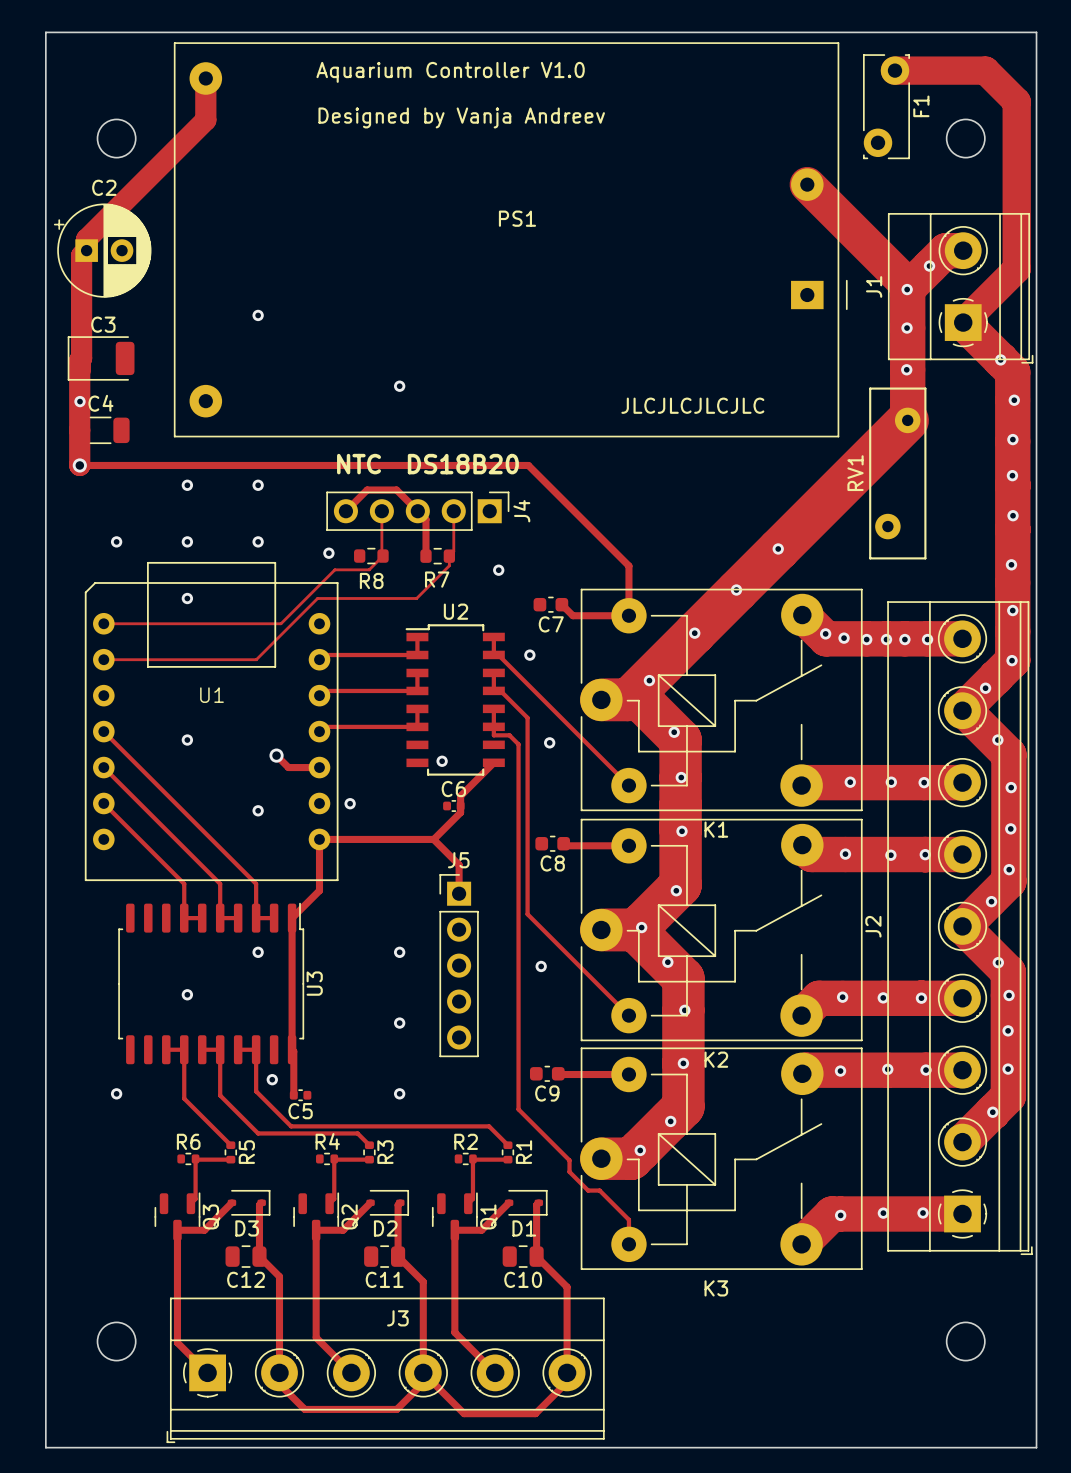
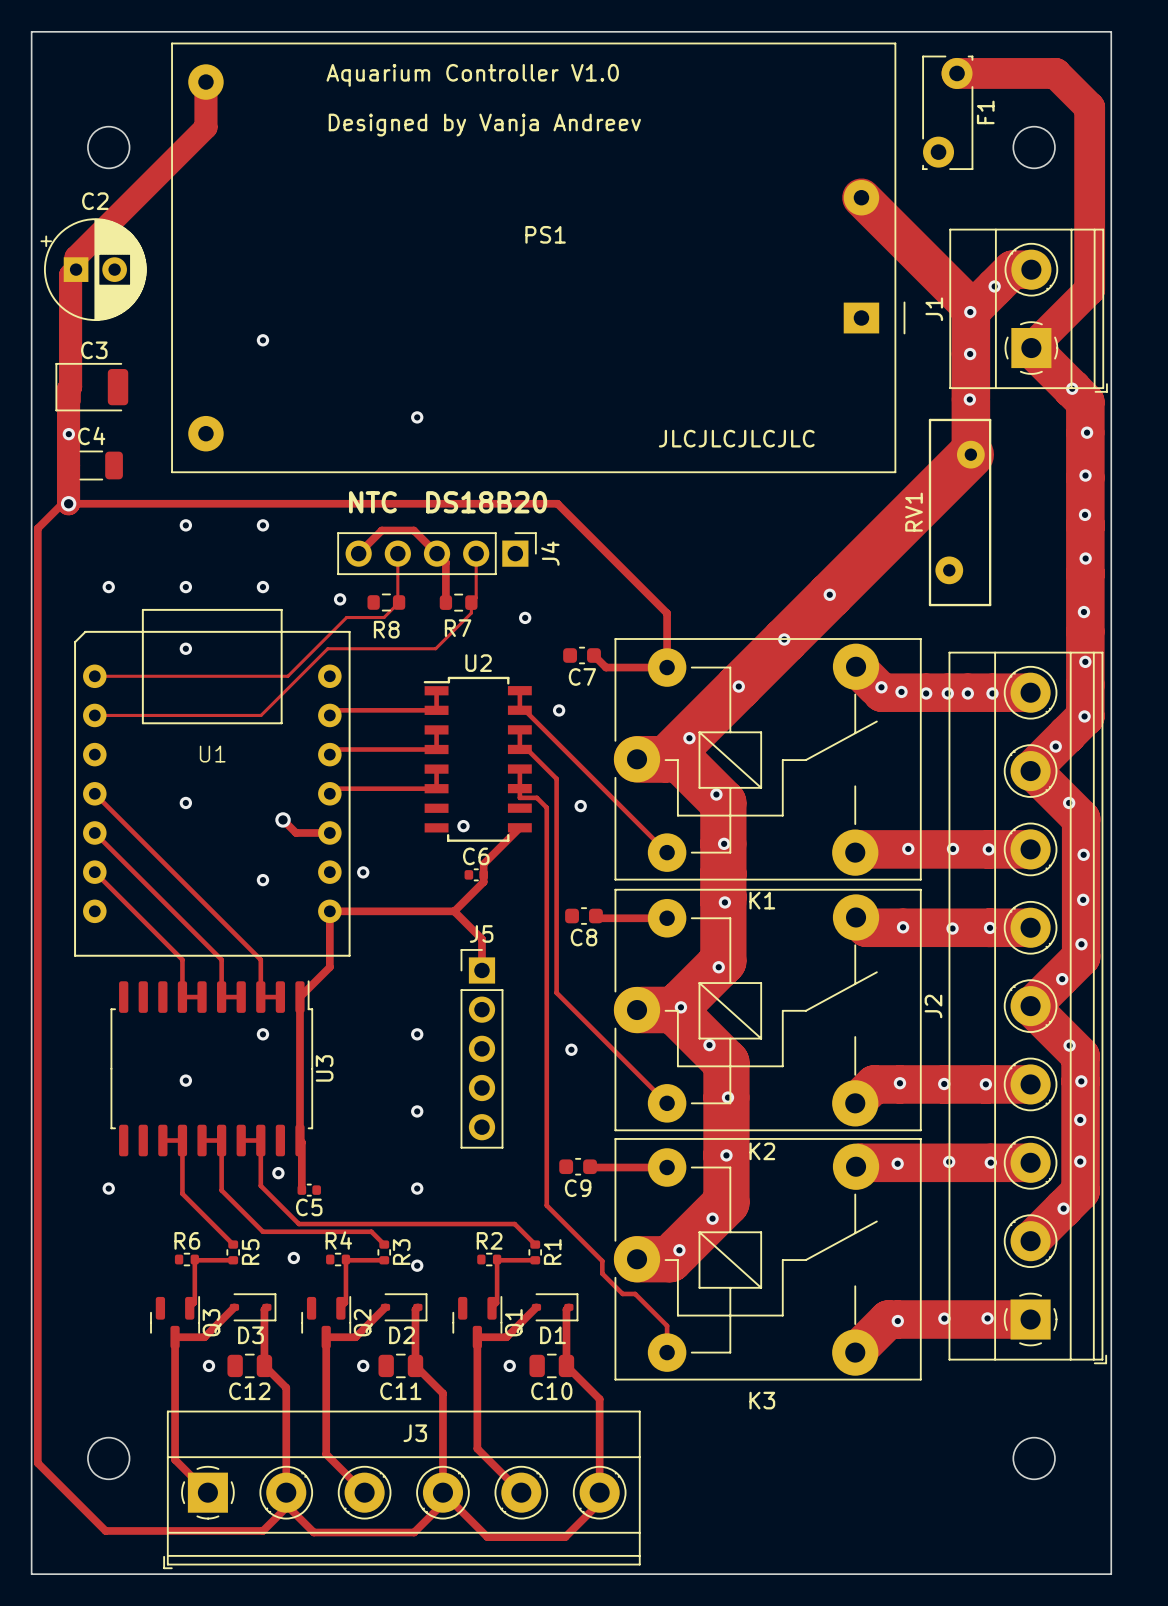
track: none -> (68, 503) (62, 503) (37, 528) (37, 1463) (105, 1530) (262, 1530) (286, 1507) (286, 1504)
via: none -> (293, 1257)
via: none -> (417, 1265)
via: none -> (208, 1365)
via: none -> (363, 1365)
via: none -> (509, 1365)

